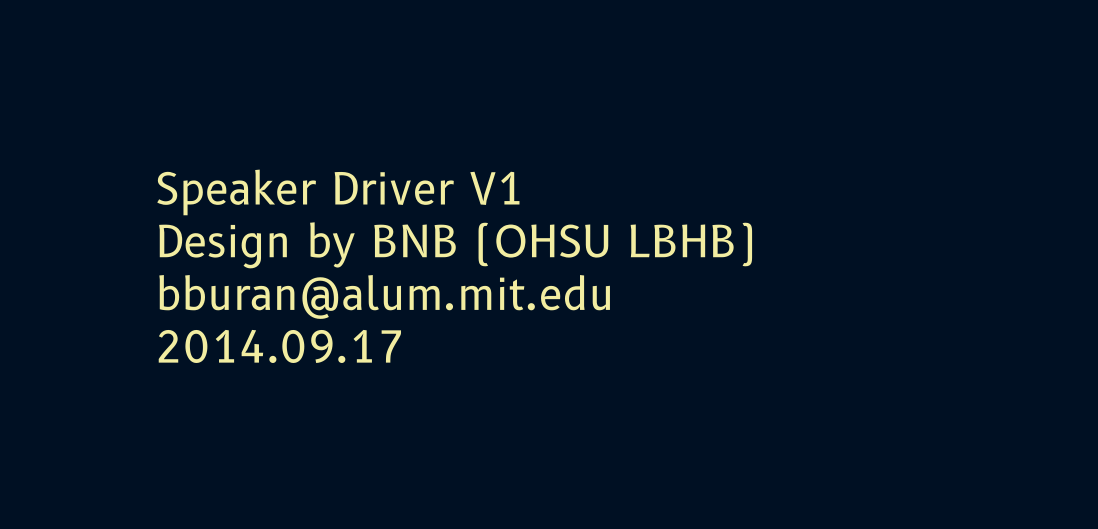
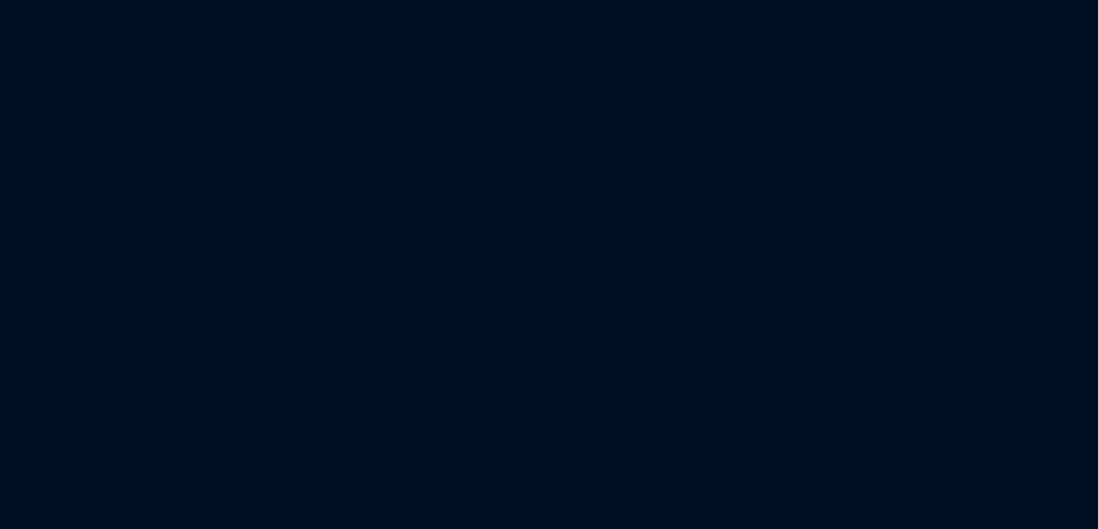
text: Speaker Driver V1 (338, 192) -> none
text: Design by BNB (OHSU LBHB) (455, 245) -> none
text: bburan@alum.mit.edu (384, 296) -> none
text: 2014.09.17 (279, 346) -> none

